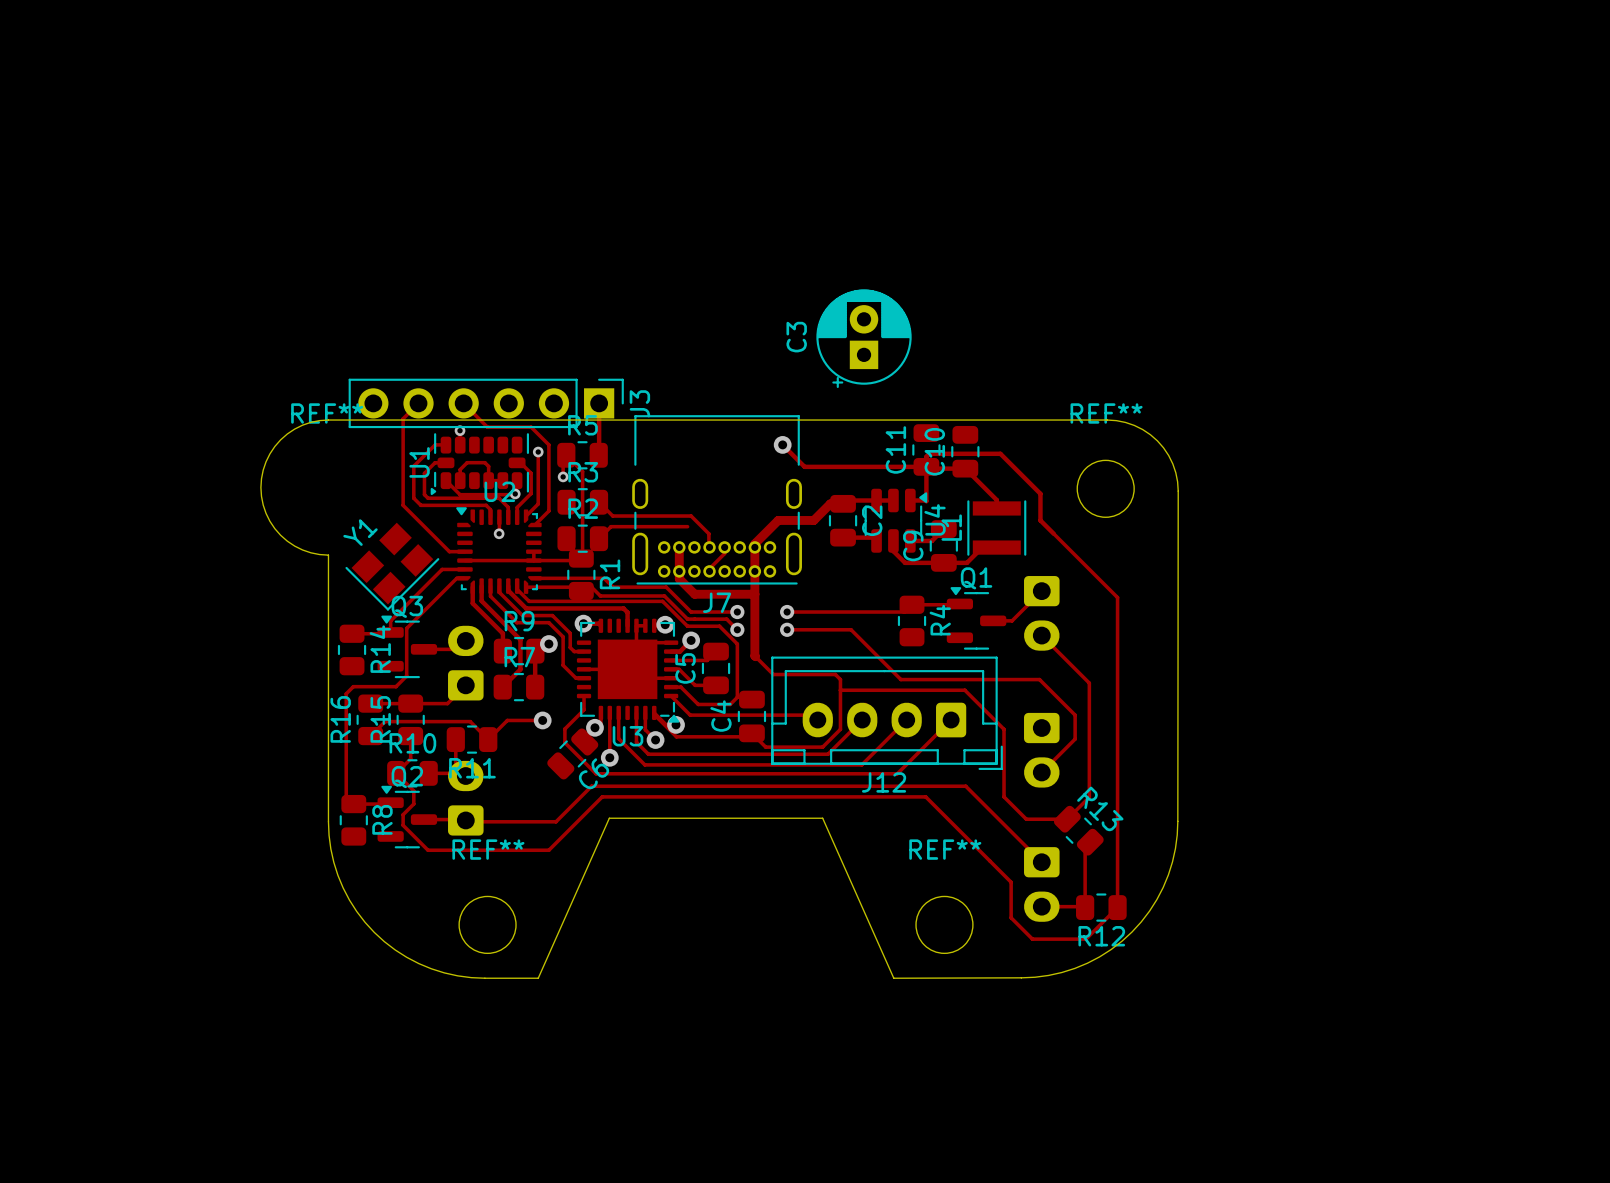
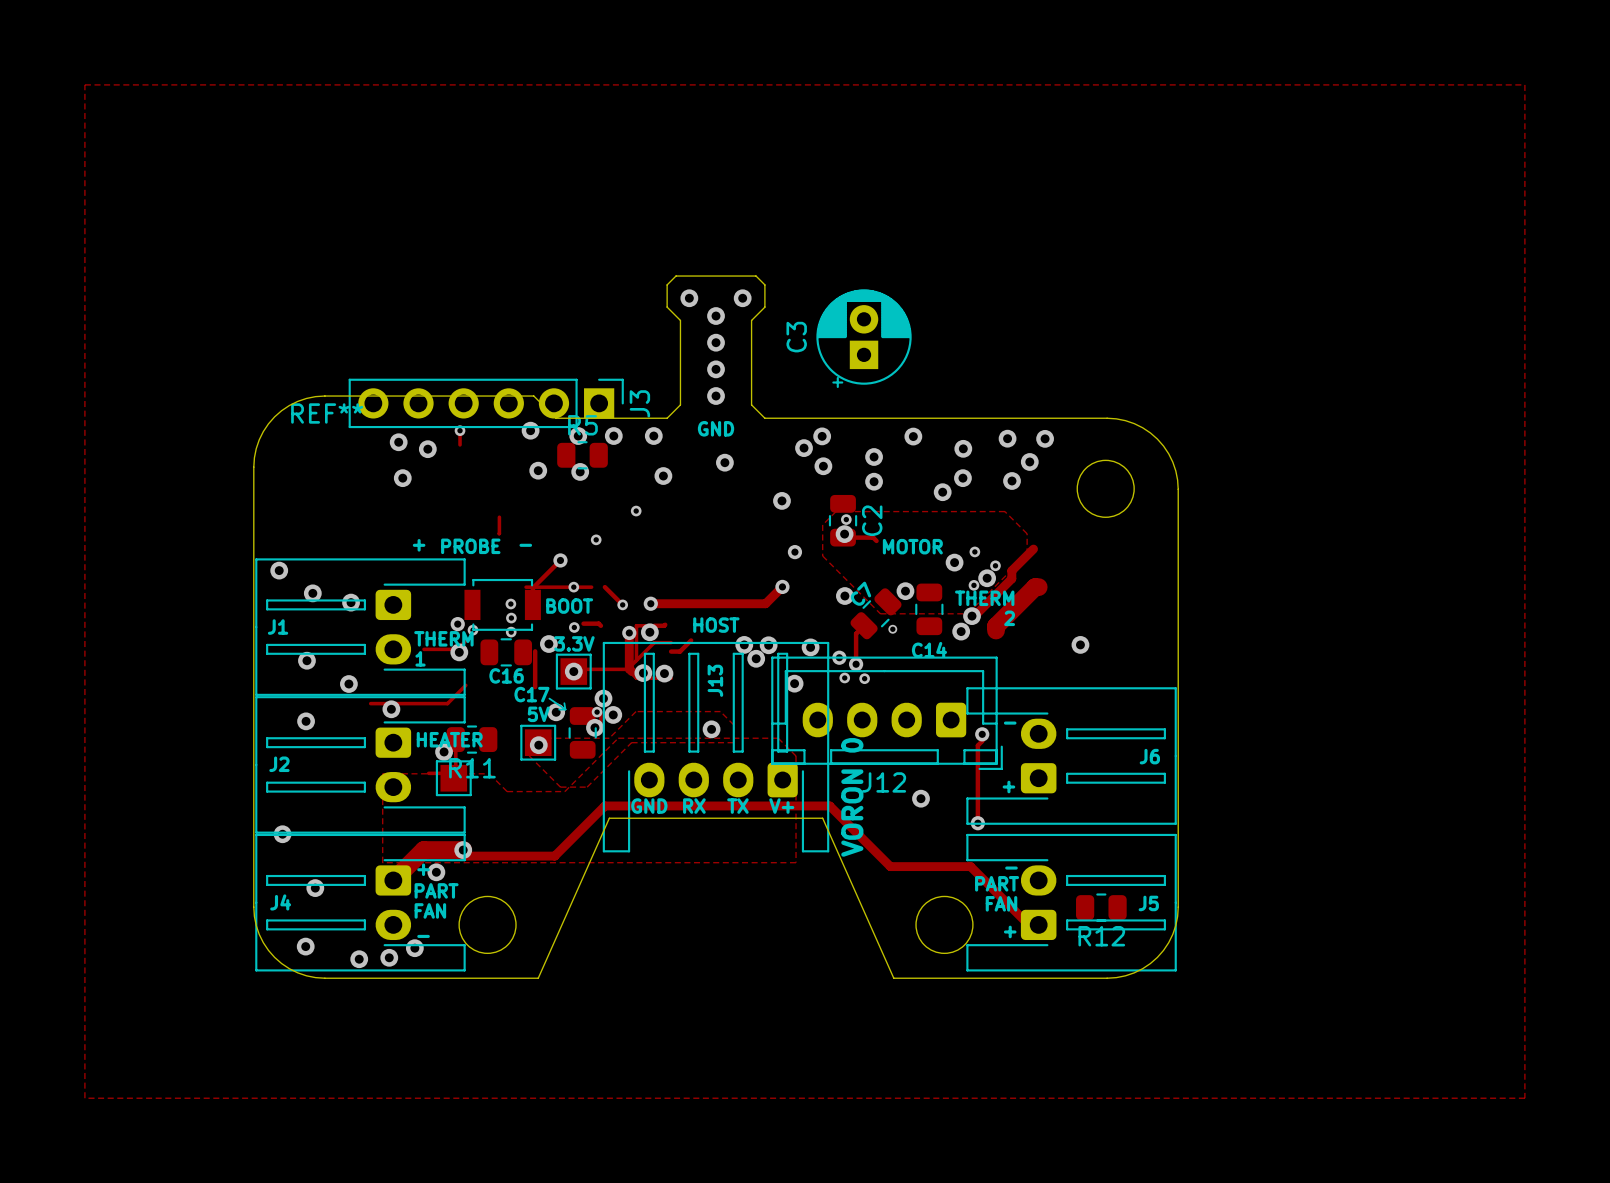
zone outline: none -> (84, 84) (1524, 84) (1524, 1098) (84, 1098) (84, 84)
via: none -> (689, 298)
via: none -> (742, 298)
via: none -> (716, 316)
via: none -> (716, 342)
via: none -> (716, 369)
via: none -> (716, 396)
track: (418, 403) (403, 418) (403, 505) (449, 551) (464, 551) -> none
track: (463, 403) (487, 427) (531, 427) (548, 444) (548, 511) (534, 525) -> none
track: (599, 403) (598, 455) -> none
REF** name: REF** (1106, 413) -> none
text: none -> GND (716, 428)
via: none -> (530, 430)
via: none -> (578, 436)
via: none -> (613, 436)
via: none -> (653, 436)
via: none -> (822, 436)
via: none -> (913, 436)
via: none -> (1007, 438)
via: none -> (1045, 438)
via: none -> (398, 442)
track: (445, 444) (435, 444) (413, 466) (413, 498) (420, 505) (486, 505) (490, 509) (490, 517) -> none
track: (782, 444) (804, 466) (965, 468) (996, 500) (996, 508) -> none
via: (782, 444) -> none
via: none -> (804, 448)
via: none -> (963, 448)
via: none -> (427, 449)
C11: (926, 449) -> none
C10: (965, 451) -> none
track: (538, 452) (538, 503) (526, 516) -> none
via: (538, 452) -> none
via: none -> (874, 457)
via: none -> (1029, 461)
track: (445, 462) (434, 462) (424, 473) (424, 494) (428, 498) (499, 498) (508, 507) (508, 517) -> none
track: (517, 462) (520, 462) (531, 473) (531, 493) (517, 507) (517, 517) -> none
via: none -> (724, 462)
U1: (479, 464) -> none
via: none -> (823, 466)
via: none -> (538, 470)
via: none -> (580, 471)
track: (563, 476) (563, 458) (566, 455) (582, 471) (582, 560) (464, 560) -> none
via: (563, 476) -> none
via: none -> (663, 476)
via: none -> (402, 478)
via: none -> (962, 478)
track: (445, 480) (460, 494) (509, 494) (517, 487) (517, 480) -> none
track: (460, 480) (460, 469) (467, 462) (484, 462) (488, 466) (488, 480) (502, 480) -> none
via: none -> (874, 481)
via: none -> (1012, 481)
via: none -> (942, 492)
via: (515, 493) -> none
J7: (717, 499) -> none
via: none -> (781, 500)
track: (893, 500) (846, 500) (843, 503) (830, 503) (813, 520) (778, 520) (754, 543) (754, 656) (773, 674) (835, 674) (840, 679) (840, 729) (822, 747) (765, 747) (755, 736) (676, 736) (654, 712) (666, 724) (676, 724) -> none
track: (910, 500) (926, 501) (926, 456) (929, 453) (1000, 453) (1040, 493) (1040, 520) (1117, 597) (1117, 907) (1086, 939) (1032, 939) (1011, 917) (1011, 882) (925, 796) (602, 796) (548, 850) (428, 850) (403, 825) (403, 814) (413, 804) (413, 790) (396, 773) (410, 758) (410, 736) -> none
R3: (582, 502) -> none
track: (599, 502) (612, 516) (691, 516) (708, 533) (709, 547) -> none
via: none -> (636, 511)
zone outline: none -> (836, 511) (822, 524) (822, 556) (880, 613) (967, 613) (1027, 554) (1027, 533) (1004, 511) (836, 511)
via: none -> (846, 519)
U4: (895, 520) -> none
track: (687, 526) (611, 526) (599, 538) -> none
L1: (996, 528) -> none
track: (943, 529) (931, 540) (910, 540) -> none
via: (499, 533) -> none
via: none -> (844, 534)
R2: (582, 538) -> none
via: none -> (596, 539)
track: (893, 540) (893, 551) (905, 562) (966, 562) (982, 547) (996, 547) -> none
text: none -> + (419, 545)
text: none -> - (525, 545)
C9: (943, 545) -> none
text: none -> PROBE (470, 546)
text: none -> MOTOR (912, 546)
track: (679, 547) (679, 571) -> none
track: (724, 547) (724, 553) (709, 568) (709, 571) -> none
track: none -> (1033, 549) (1011, 570) (1011, 578) (974, 616) (972, 616)
U2: (498, 550) -> none
track: (533, 551) (533, 560) -> none
via: none -> (974, 551)
via: none -> (794, 552)
track: none -> (560, 560) (532, 588) (532, 604)
via: none -> (560, 560)
via: none -> (954, 562)
via: none -> (995, 565)
Y1: (392, 566) -> none
track: (464, 569) (442, 569) (390, 620) (389, 633) (352, 633) -> none
via: none -> (279, 570)
track: (679, 571) (679, 578) (694, 594) (754, 594) -> none
R1: (581, 574) -> none
track: (463, 578) (456, 578) (406, 628) (406, 676) (396, 686) (353, 686) (346, 693) (346, 796) (353, 804) (390, 802) -> none
track: (534, 578) (604, 578) (612, 587) (666, 587) (691, 612) (737, 612) -> none
via: none -> (987, 578)
via: none -> (973, 585)
track: (481, 586) (481, 600) (520, 639) (520, 669) (502, 687) -> none
track: (490, 586) (490, 596) (516, 622) (548, 622) (563, 636) (563, 665) (576, 678) (584, 678) -> none
track: (499, 586) (499, 592) (522, 615) (552, 615) (570, 633) (570, 647) (574, 651) (584, 651) -> none
track: (508, 586) (508, 590) (526, 608) (623, 608) (627, 612) (627, 625) -> none
track: (517, 586) (517, 589) (529, 601) (662, 601) (687, 626) (719, 626) (737, 644) (737, 697) (730, 704) (698, 704) (680, 687) (671, 687) -> none
track: none -> (782, 586) (765, 603) (650, 603)
via: none -> (782, 586)
track: (472, 587) (472, 603) (502, 633) (502, 651) -> none
via: none -> (573, 587)
track: (591, 587) (600, 596) (664, 596) (687, 619) (726, 619) (737, 629) -> none
track: none -> (604, 587) (622, 604)
track: none -> (1038, 587) (1035, 587) (996, 626) (996, 630)
via: none -> (905, 591)
track: (1041, 591) (1012, 620) (993, 620) -> none
via: none -> (312, 593)
via: none -> (844, 596)
text: none -> THERM (984, 598)
via: none -> (351, 602)
via: none -> (650, 603)
track: (959, 603) (912, 604) (904, 612) (787, 612) -> none
part: none -> (502, 604)
via: none -> (510, 604)
via: none -> (622, 604)
text: none -> BOOT (569, 606)
C14: none -> (929, 609)
via: (737, 612) -> none
via: (787, 612) -> none
C7: none -> (876, 613)
part: (1041, 613) -> none
via size: [574, 614, 593, 633] -> [569, 622, 580, 633]
via: none -> (972, 616)
via: none -> (511, 618)
Q1: (976, 618) -> none
text: none -> 2 (1009, 618)
R4: (912, 621) -> none
via: none -> (457, 624)
via position: (665, 624) -> (649, 632)
text: none -> HOST (716, 625)
track: none -> (864, 625) (856, 633) (856, 664)
J1: none -> (360, 627)
via position: (737, 629) -> (744, 644)
track: (787, 629) (851, 629) (900, 679) (1039, 679) (1075, 715) (1075, 739) (1041, 772) -> none
via: (787, 629) -> none
via: none -> (892, 629)
via: none -> (473, 630)
via: none -> (961, 631)
via: none -> (511, 632)
track: none -> (629, 632) (629, 668) (631, 671)
via: none -> (629, 632)
track: (1041, 635) (1089, 683) (1089, 797) (1067, 819) (1026, 819) (1004, 796) (1004, 729) (964, 690) (840, 690) -> none
text: none -> THERM (443, 638)
via: (691, 640) -> none
text: none -> 3.3V (574, 643)
via: none -> (1080, 644)
via: none -> (768, 645)
Q3: (407, 646) -> none
via: none -> (810, 647)
R14: (352, 649) -> none
R9: (519, 651) -> none
track: (716, 651) (707, 660) (671, 660) -> none
via: none -> (459, 652)
C16: none -> (506, 652)
via: none -> (839, 657)
text: none -> 1 (420, 658)
via: none -> (756, 658)
via: none -> (306, 660)
part: (465, 663) -> none
via: none -> (856, 664)
C5: (716, 668) -> none
track: (671, 669) (679, 669) (695, 685) (716, 685) -> none
U3: (628, 670) -> none
part: none -> (573, 671)
via: none -> (573, 671)
via: none -> (643, 673)
via: none -> (664, 673)
via: none -> (844, 677)
via: none -> (864, 678)
via: none -> (794, 683)
via: none -> (348, 684)
R7: (518, 687) -> none
track: (584, 696) (584, 709) (564, 728) (564, 742) (596, 773) (897, 773) (951, 720) -> none
track: (671, 696) (690, 715) (812, 715) (817, 720) -> none
line: none -> (549, 698) (565, 709)
via: none -> (603, 698)
line: none -> (564, 703) (565, 709)
via: none -> (391, 709)
line: none -> (565, 709) (559, 709)
zone outline: none -> (636, 711) (720, 711) (733, 724) (733, 742) (631, 742) (587, 787) (560, 787) (529, 756) (529, 751) (542, 738) (609, 738) (636, 711)
via: none -> (597, 712)
track: (609, 712) (609, 757) -> none
track: (618, 712) (618, 738) (644, 764) (861, 764) (906, 720) -> none
track: (636, 712) (636, 742) (648, 754) (828, 754) (862, 720) -> none
track: (645, 712) (645, 729) (655, 740) -> none
text: none -> 5V (538, 714)
via: none -> (613, 714)
C4: (751, 716) -> none
R16: (370, 719) -> none
R15: (410, 719) -> none
track: (542, 720) (507, 720) (488, 739) (470, 721) (385, 721) (370, 736) -> none
via position: (542, 720) -> (556, 712)
via: none -> (306, 721)
text: none -> - (1010, 723)
via: (676, 724) -> none
via: none -> (711, 729)
C17: none -> (582, 732)
track: none -> (982, 734) (982, 741) (977, 745) (977, 823)
via: none -> (982, 734)
zone outline: none -> (618, 738) (564, 791) (507, 791) (489, 773) (382, 773) (382, 862) (796, 862) (796, 756) (778, 738) (618, 738)
text: none -> HEATER (449, 739)
via: (655, 740) -> none
part: none -> (538, 742)
via: none -> (538, 745)
J13: none -> (716, 747)
part: (1041, 750) -> none
via: none -> (444, 751)
C6: (572, 753) -> none
J6: none -> (1071, 756)
via: (609, 757) -> none
J2: none -> (360, 764)
R10: (412, 773) -> none
part: none -> (453, 778)
text: none -> + (1008, 787)
text: none -> VORON 0 (852, 797)
J4 side: bottom (465, 798) -> top (360, 902)
via: none -> (920, 798)
text: none -> GND (649, 806)
text: none -> RX (694, 806)
text: none -> TX (737, 806)
text: none -> V+ (781, 806)
Q2: (407, 817) -> none
track: (423, 819) (556, 821) (591, 786) (965, 786) (1041, 862) -> none
R8: (353, 820) -> none
via: none -> (977, 823)
R13: (1078, 830) -> none
via: none -> (282, 834)
track: (1090, 842) (1085, 847) (1085, 907) (1041, 906) -> none
REF** name: REF** (488, 849) -> none
REF** name: REF** (945, 849) -> none
via: none -> (463, 850)
text: none -> - (1011, 868)
text: none -> + (423, 869)
via: none -> (436, 872)
track: none -> (393, 880) (423, 850) (463, 850) (464, 856) (554, 856) (604, 805) (829, 805) (890, 866) (970, 866) (1028, 924) (1038, 924)
text: none -> PART (997, 883)
J5 side: bottom (1041, 884) -> top (1071, 902)
via: none -> (315, 888)
text: none -> PART (436, 890)
text: none -> FAN (1001, 903)
text: none -> FAN (430, 910)
text: none -> + (1010, 931)
text: none -> - (423, 936)
via: none -> (305, 946)
via: none -> (414, 948)
via: none -> (389, 957)
via: none -> (359, 959)
board edge: (484, 978) (444, 972) (418, 963) (395, 949) (374, 932) (356, 911) (337, 875) (330, 848) (328, 821) (328, 555) (302, 549) (287, 541) (269, 521) (261, 496) (261, 478) (266, 461) (274, 446) (287, 433) (310, 422) (328, 420) (1107, 420) (1134, 425) (1157, 440) (1168, 455) (1175, 472) (1178, 491) (1177, 821) (1175, 848) (1163, 887) (1149, 911) (1132, 932) (1099, 956) (1074, 968) (1035, 977) (893, 978) -> (484, 978) (315, 977) (297, 972) (281, 963) (268, 950) (259, 934) (253, 907) (253, 467) (256, 448) (263, 431) (274, 416) (297, 401) (315, 396) (533, 396) (556, 418) (667, 418) (680, 404) (680, 320) (667, 307) (667, 284) (676, 276) (756, 276) (764, 284) (764, 307) (751, 320) (751, 404) (764, 418) (1116, 418) (1134, 423) (1150, 432) (1163, 446) (1175, 470) (1178, 489) (1178, 907) (1175, 925) (1168, 942) (1150, 963) (1134, 972) (1116, 977) (893, 978)

